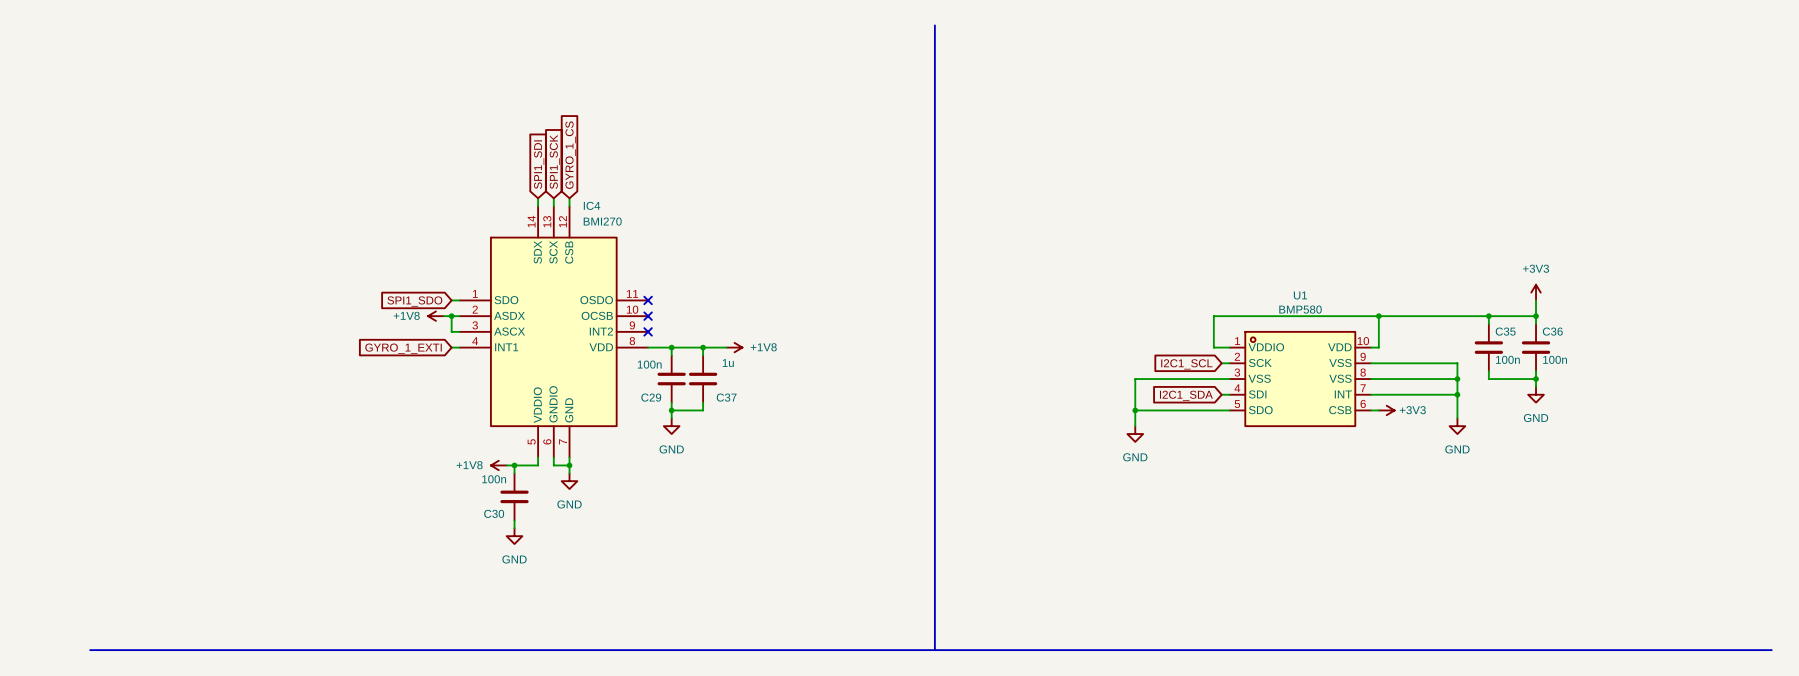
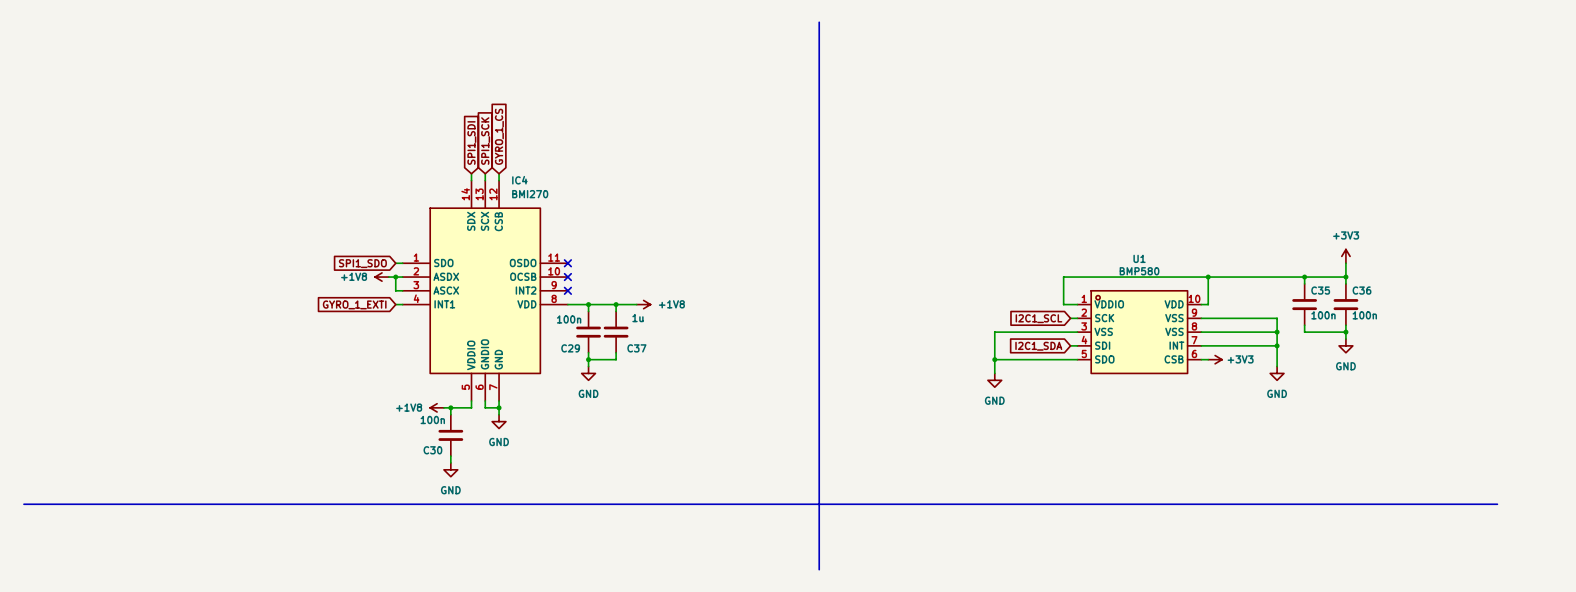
line: (90, 650) (1771, 650) -> (23, 504) (1497, 504)

